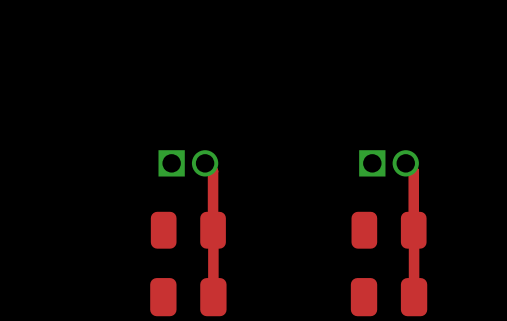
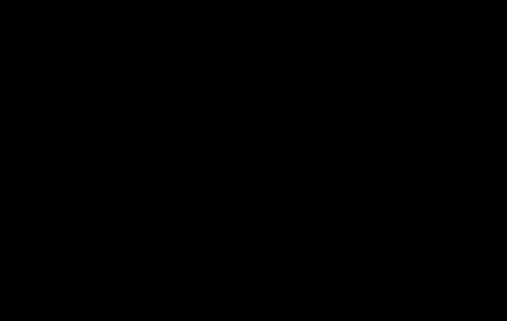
part: (188, 163) -> none
top track: (205, 163) (213, 171) (213, 230) -> none
part: (389, 163) -> none
top track: (405, 163) (413, 171) (413, 230) -> none
part: (188, 230) -> none
top track: (213, 230) (213, 297) -> none
part: (389, 230) -> none
top track: (414, 230) (414, 297) -> none
part: (188, 297) -> none
part: (389, 297) -> none

